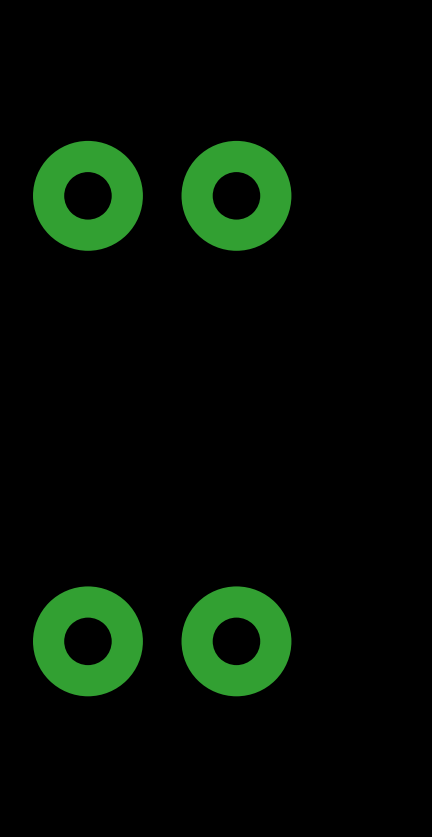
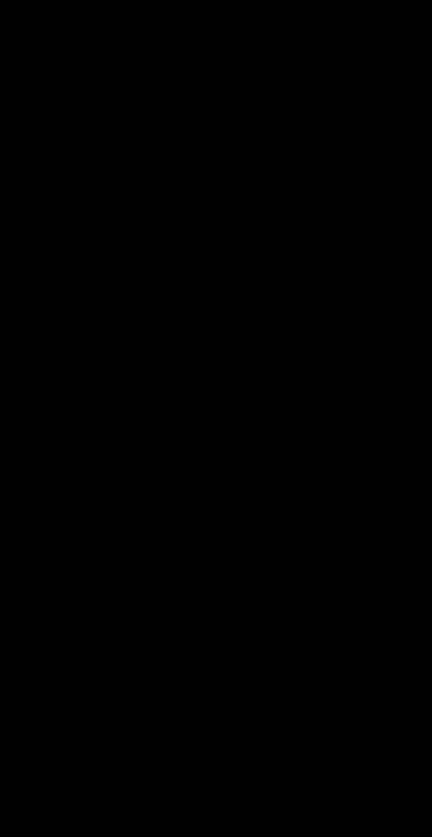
part: (162, 195) -> none
part: (162, 641) -> none

